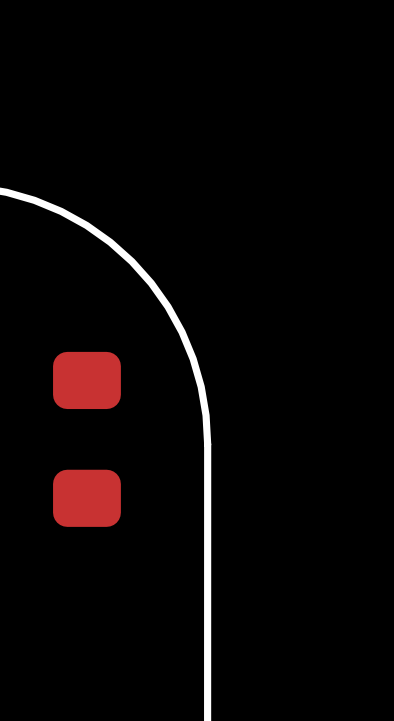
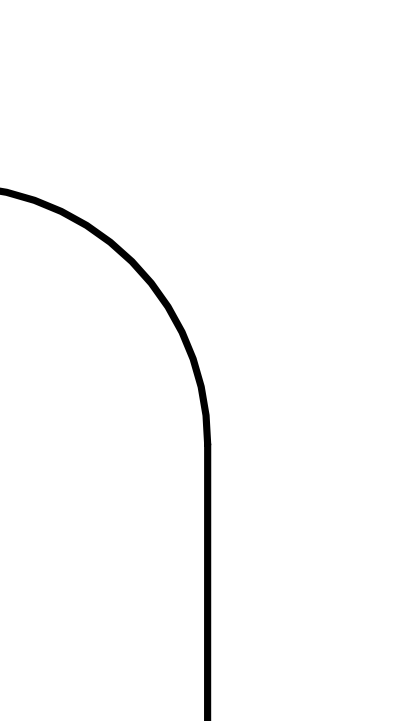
part: (86, 439) -> none

